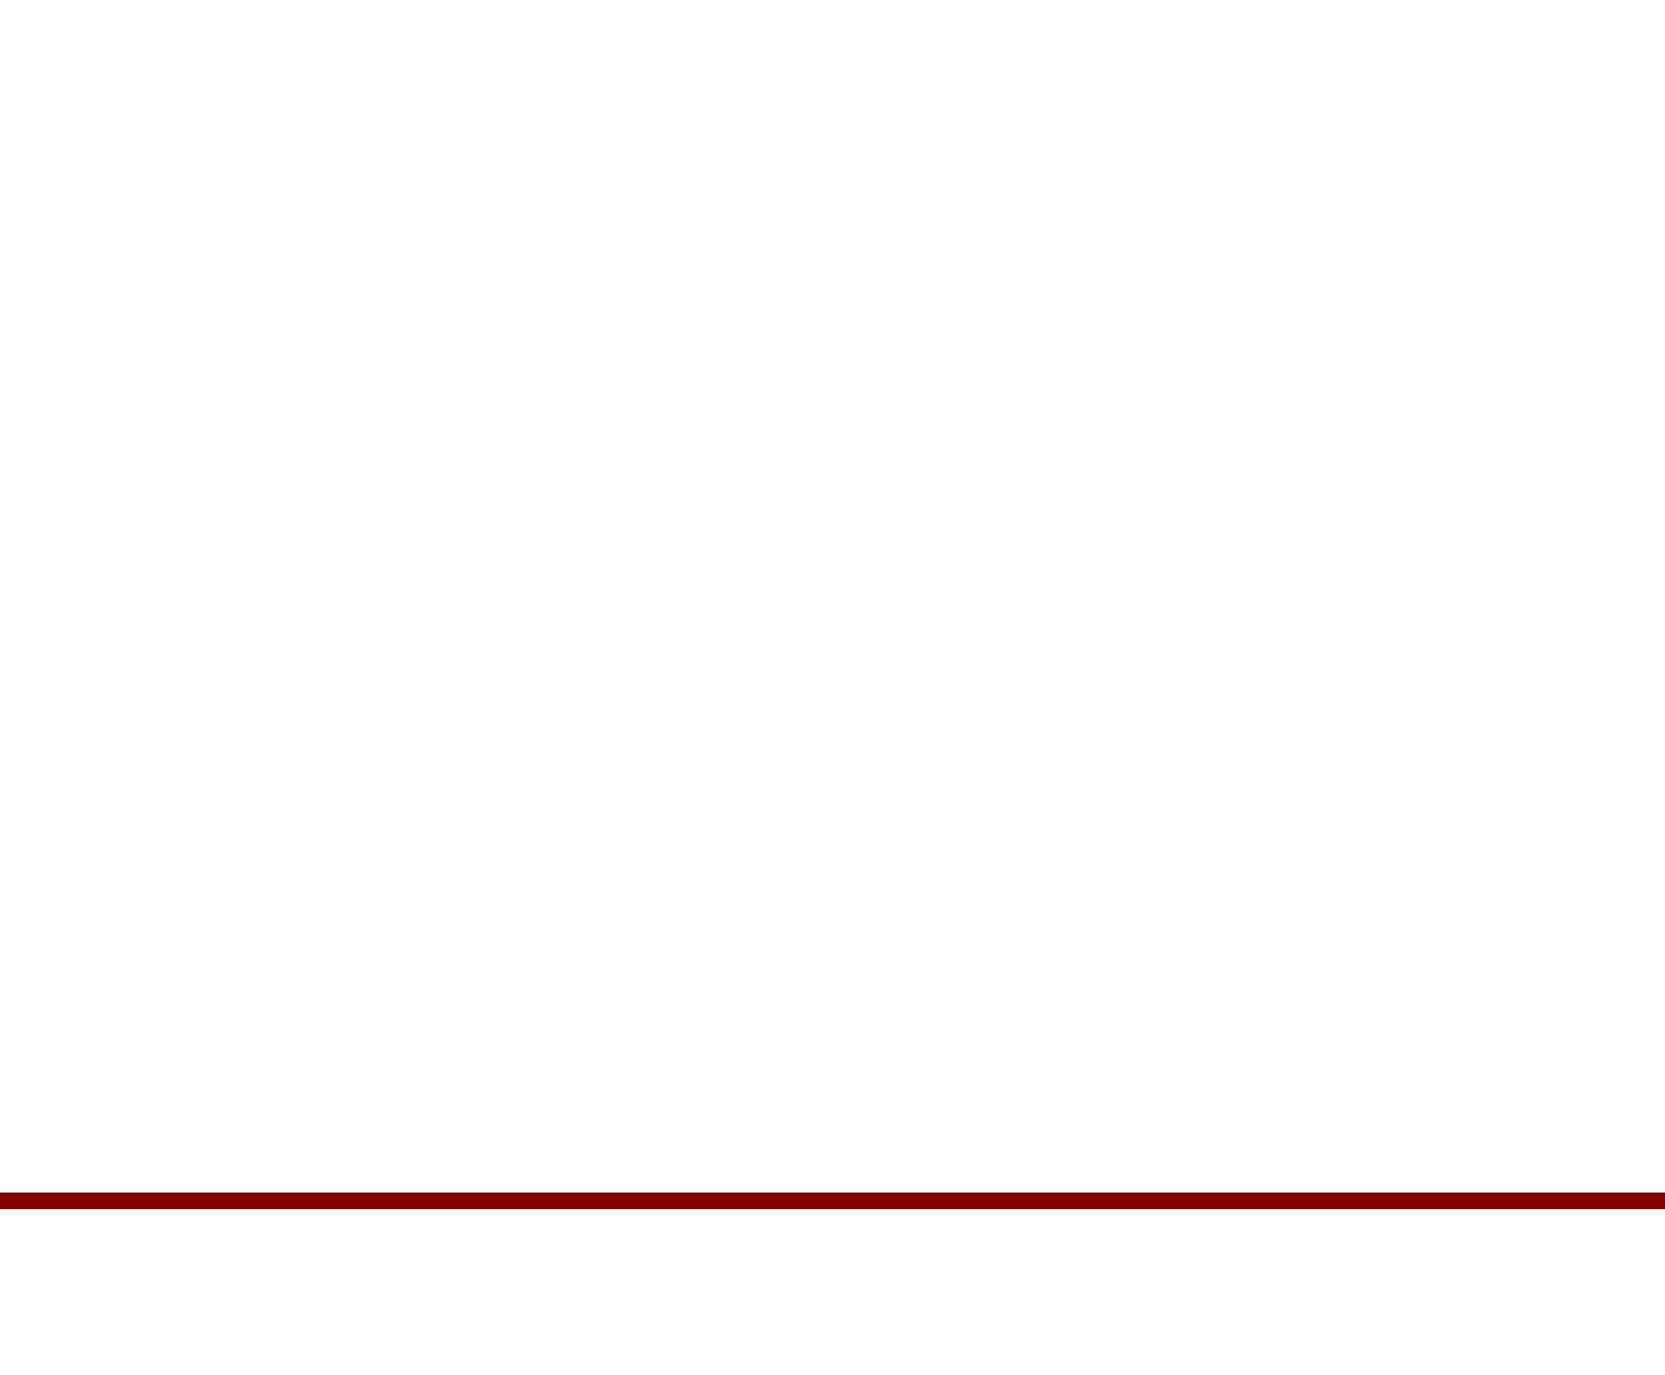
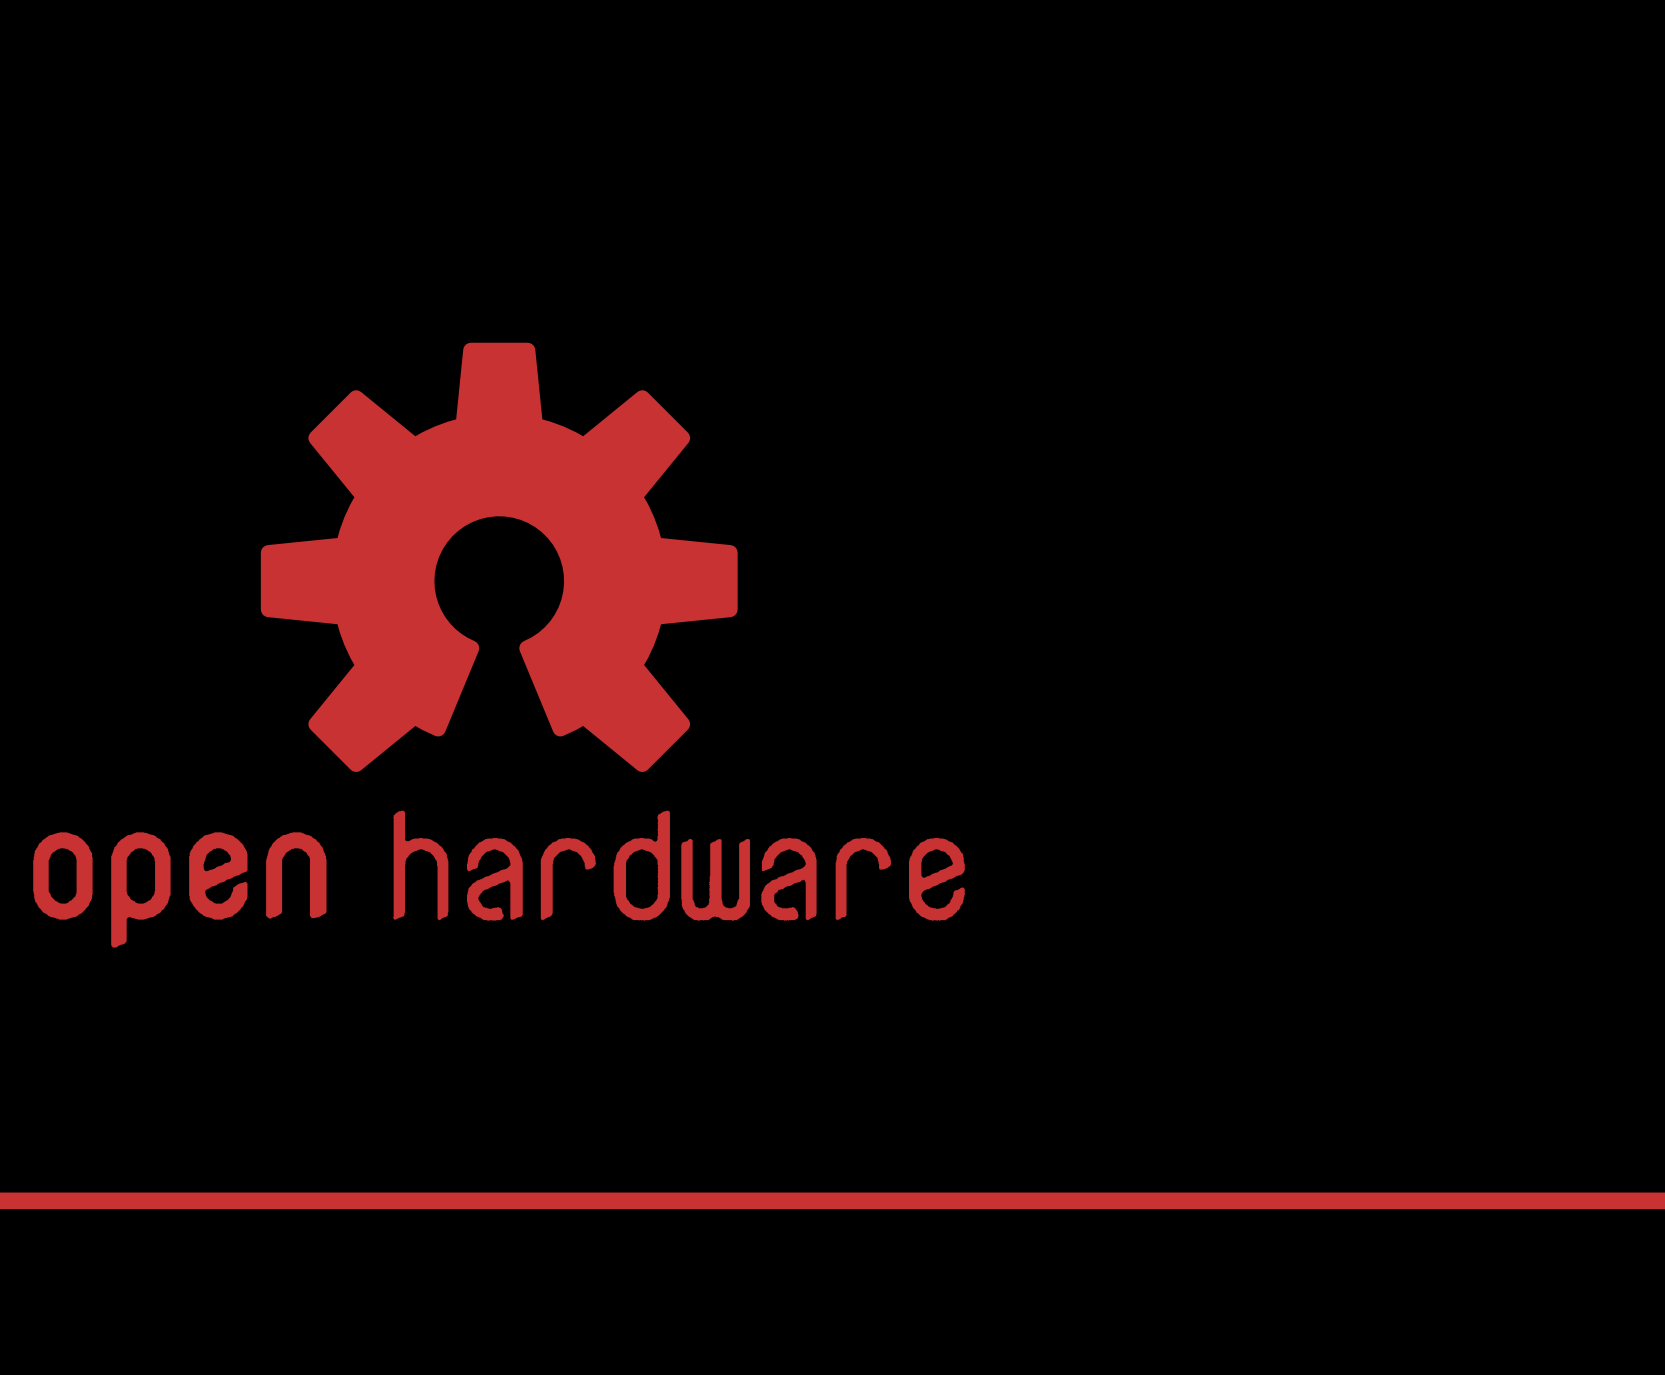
part: none -> (498, 645)

